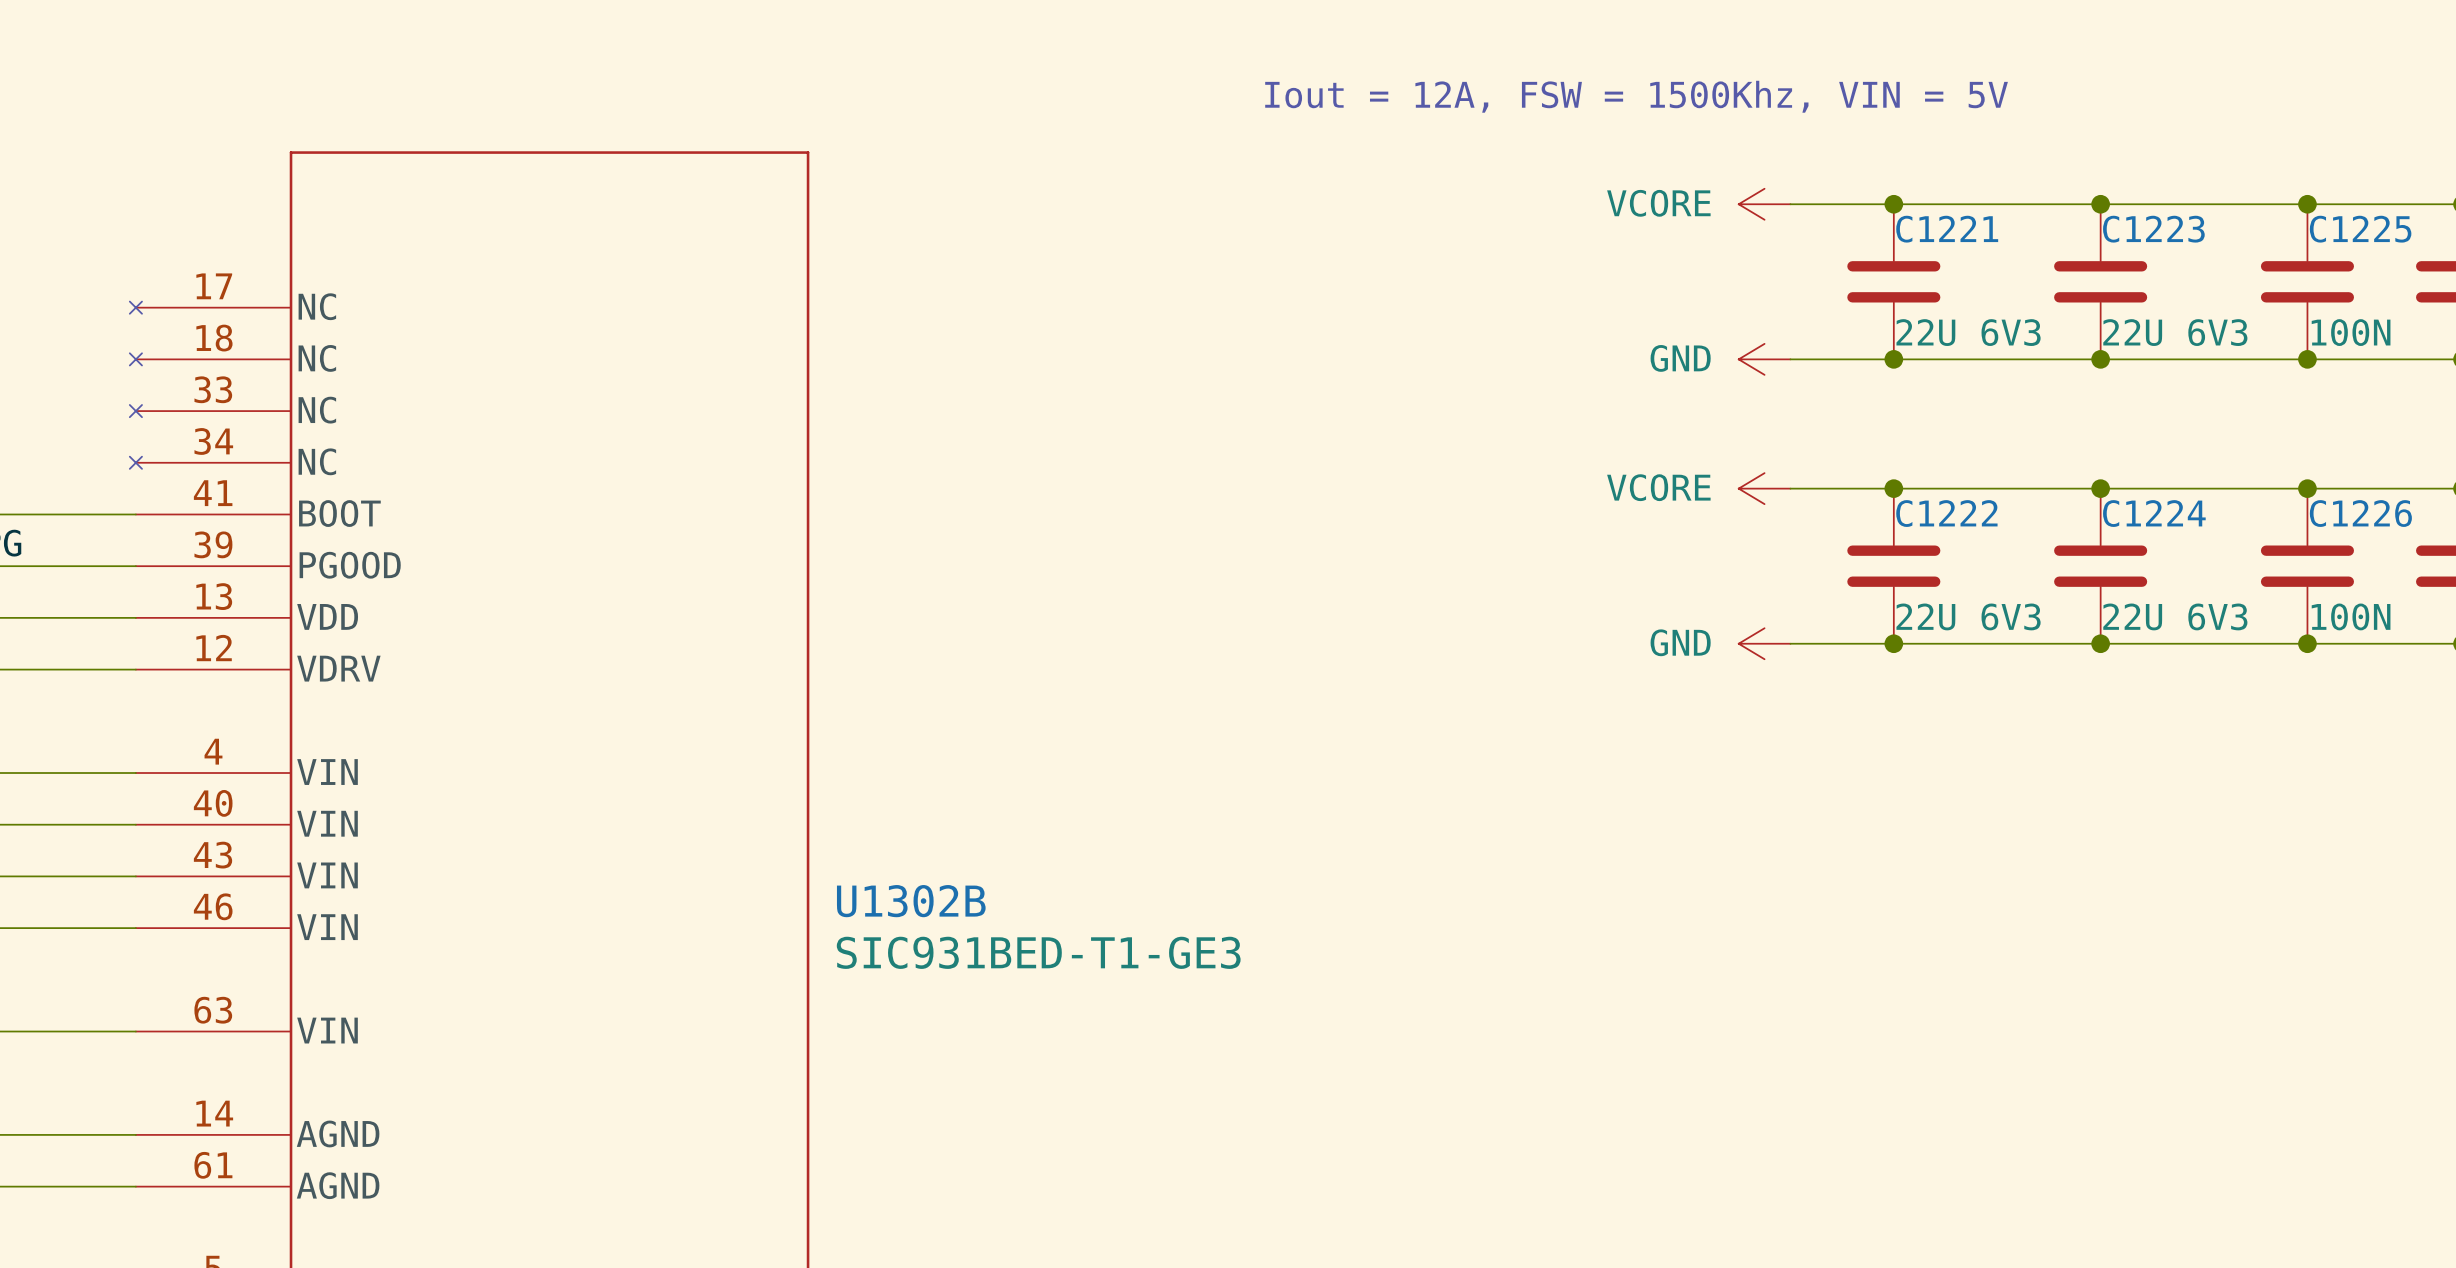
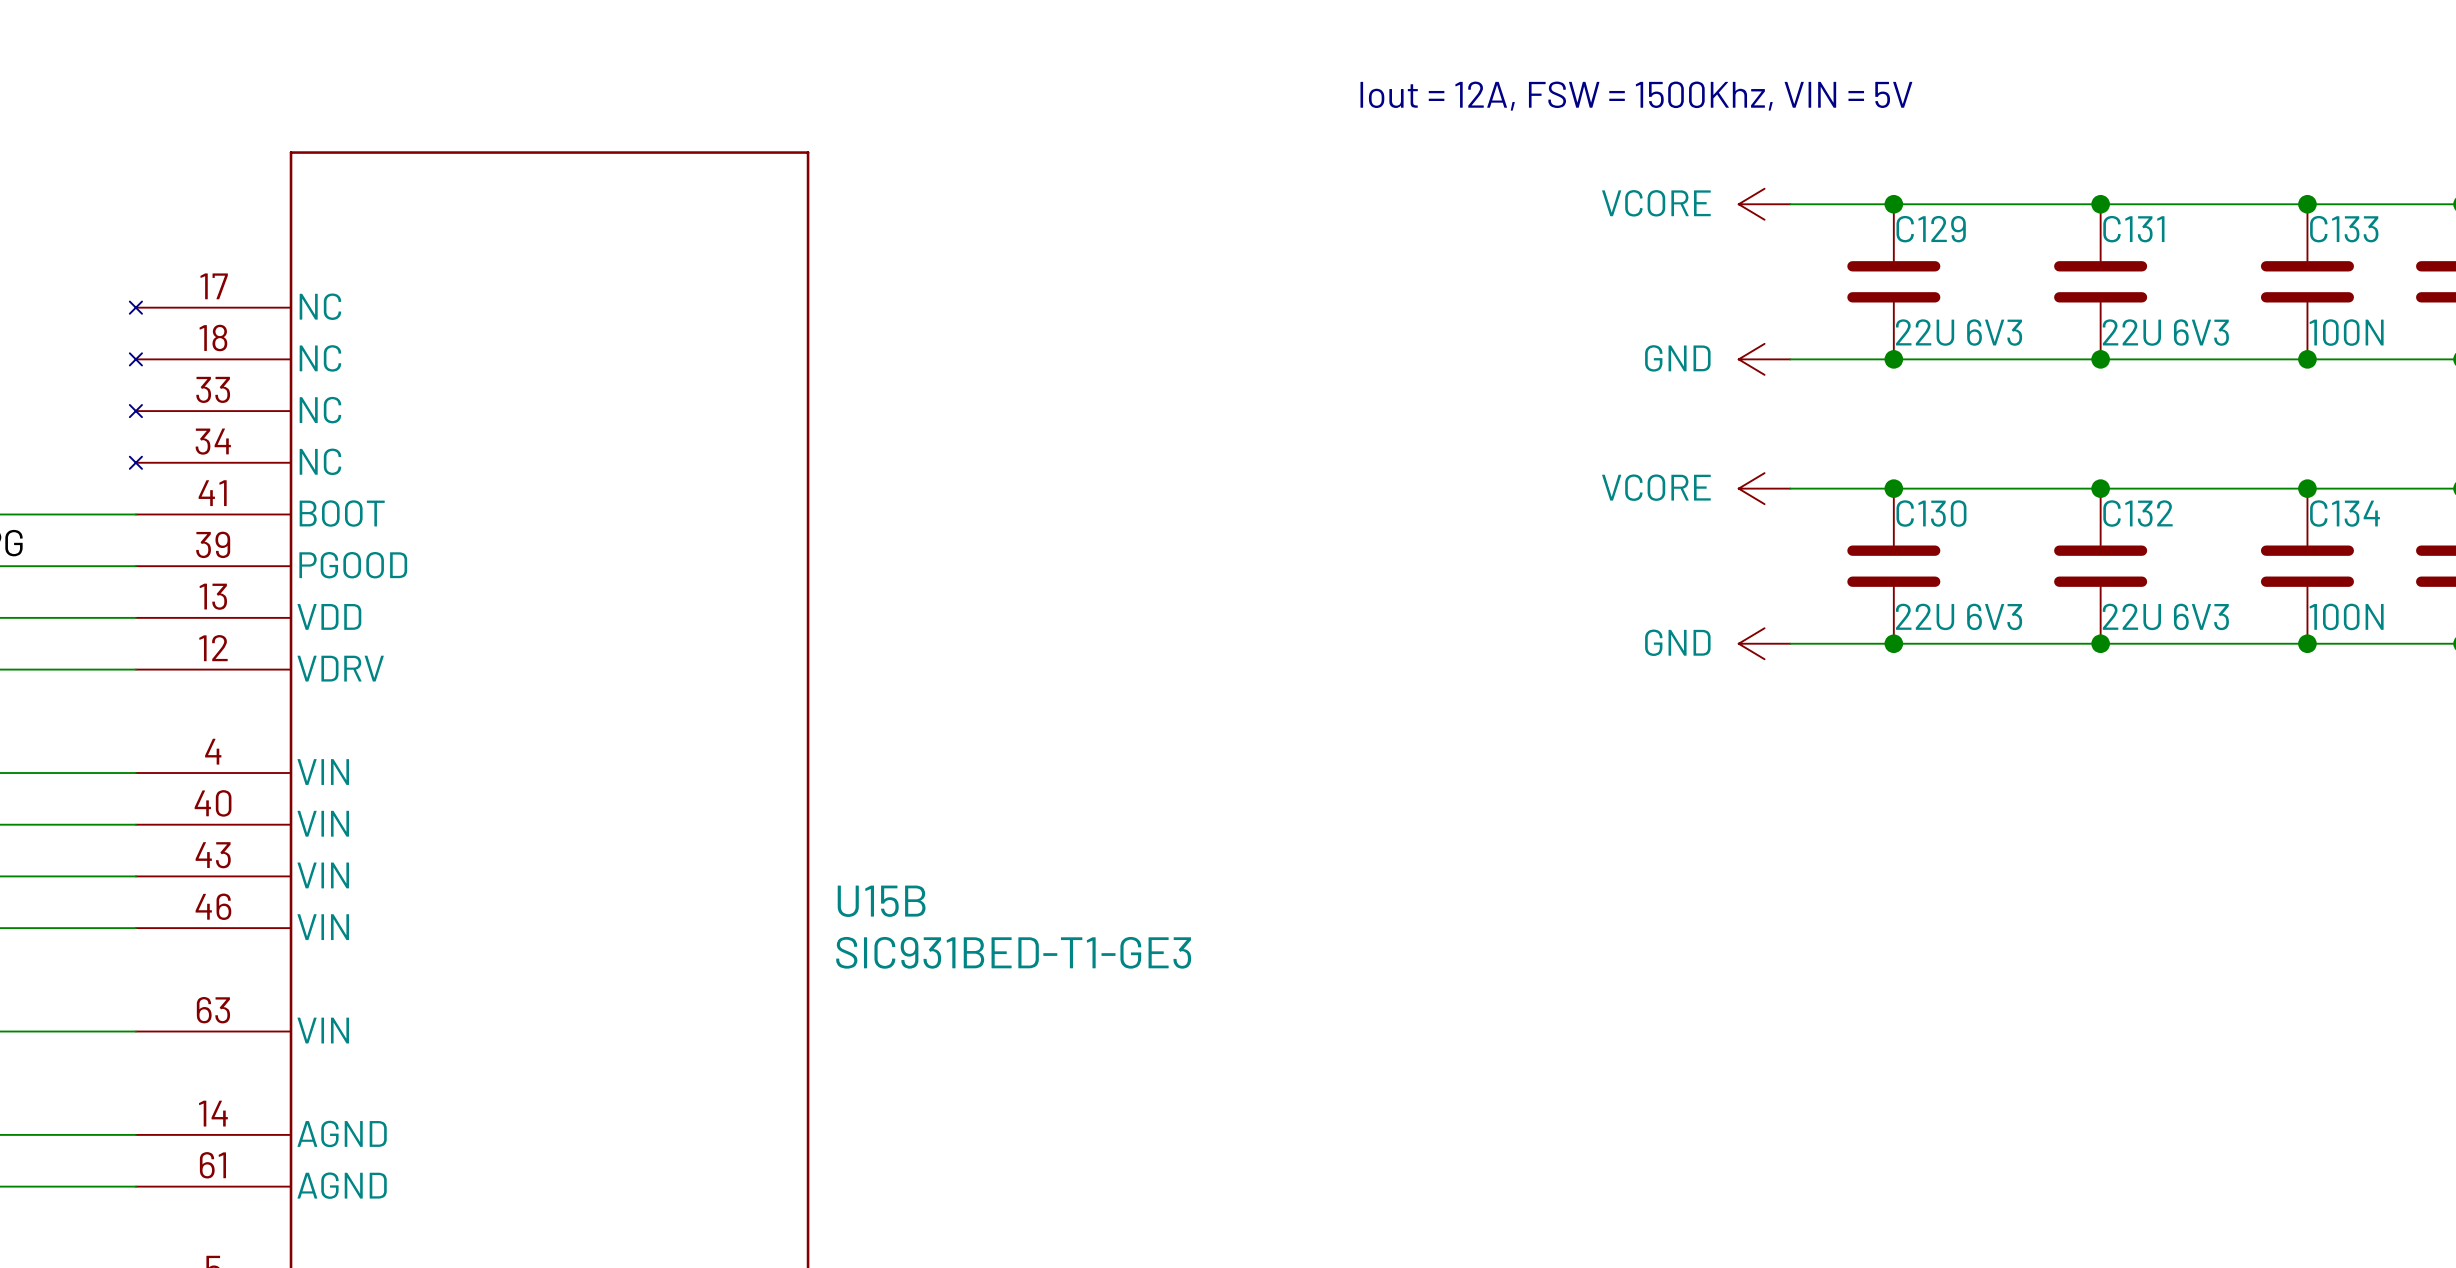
C1221 name: C1221 (1947, 229) -> C129 (1931, 229)
C1223 name: C1223 (2153, 229) -> C131 (2133, 229)
C1225 name: C1225 (2360, 229) -> C133 (2344, 229)
C1222 name: C1222 (1946, 513) -> C130 (1931, 513)
C1224 name: C1224 (2154, 513) -> C132 (2137, 513)
C1226 name: C1226 (2360, 513) -> C134 (2345, 513)
U1302B name: U1302B (911, 901) -> U15B (881, 901)

